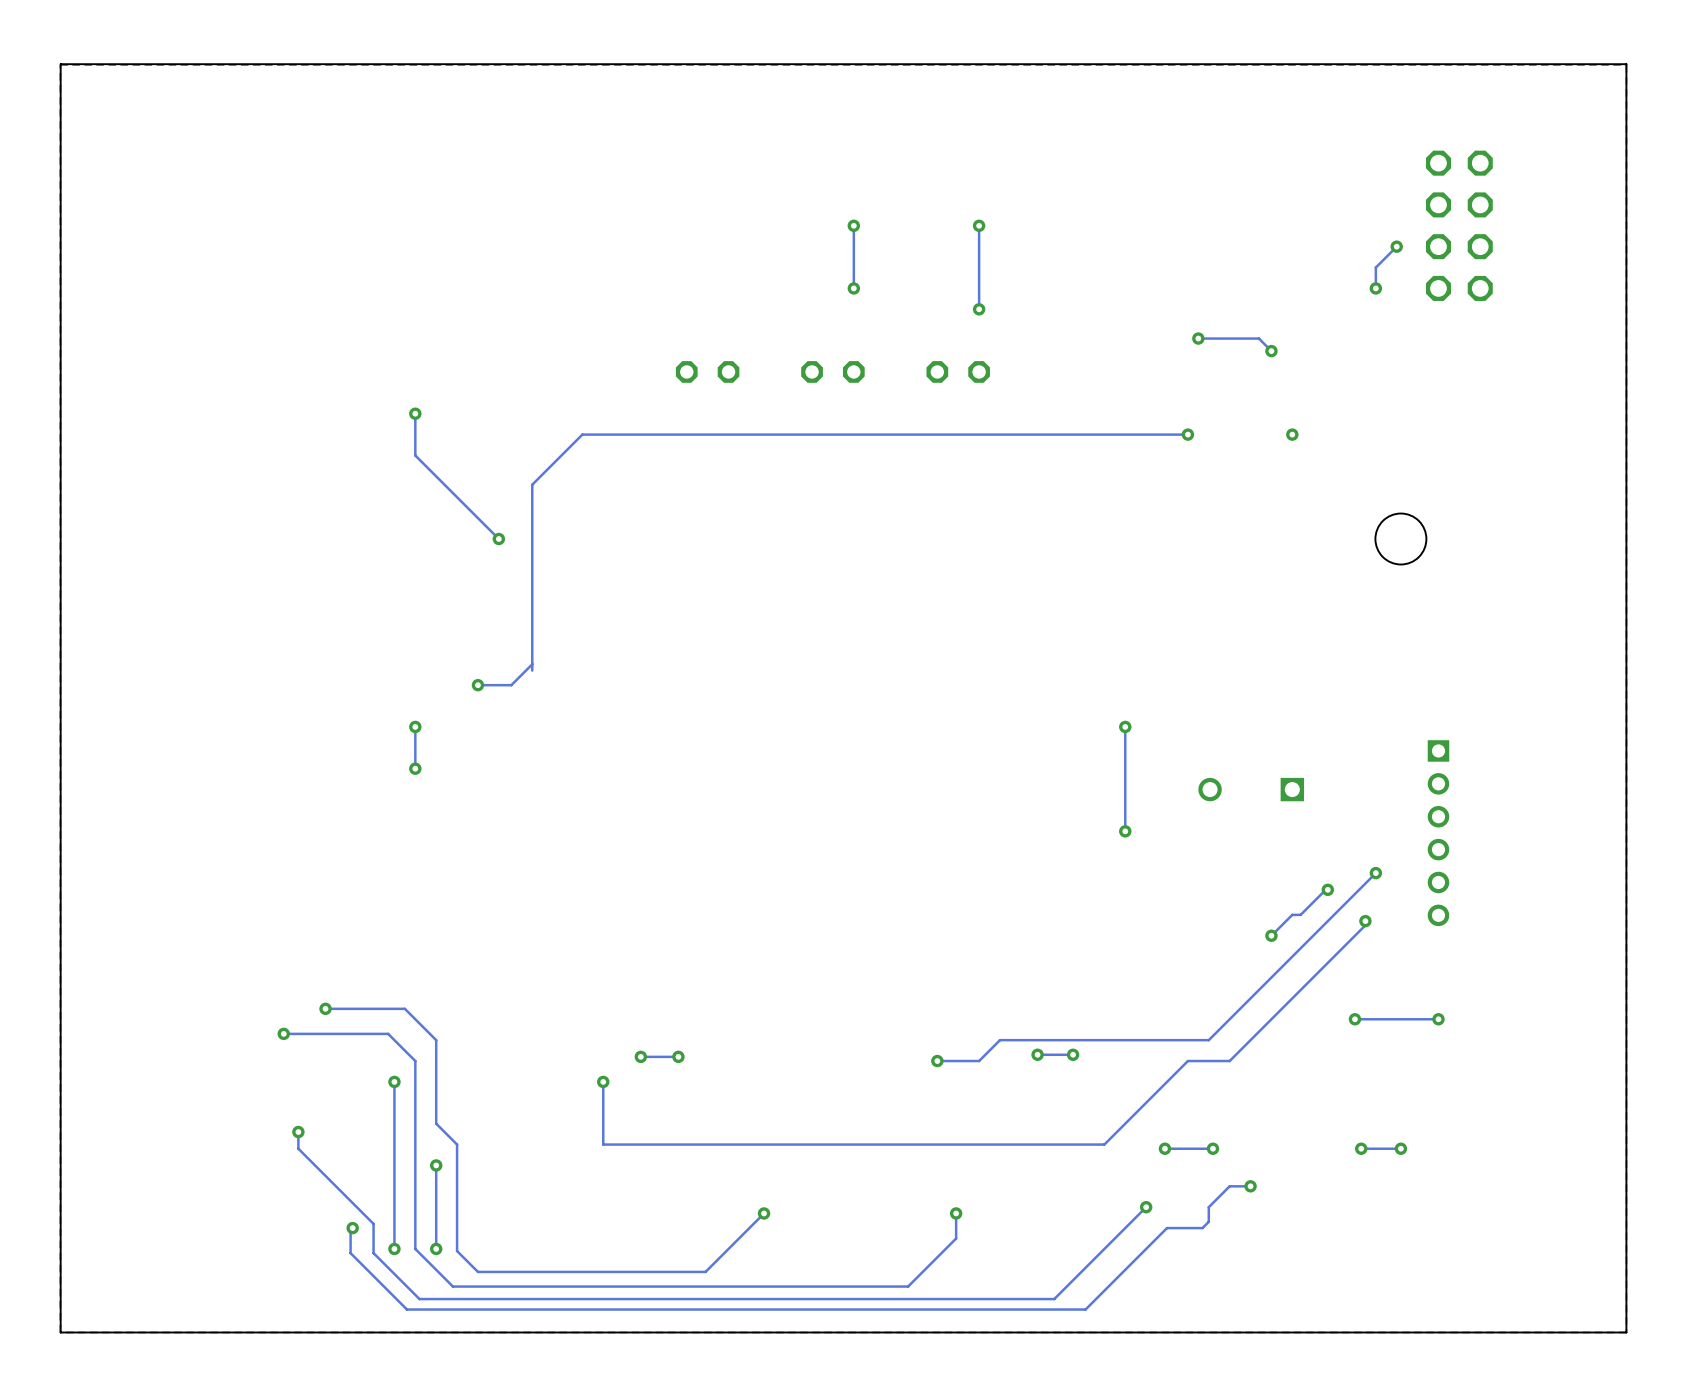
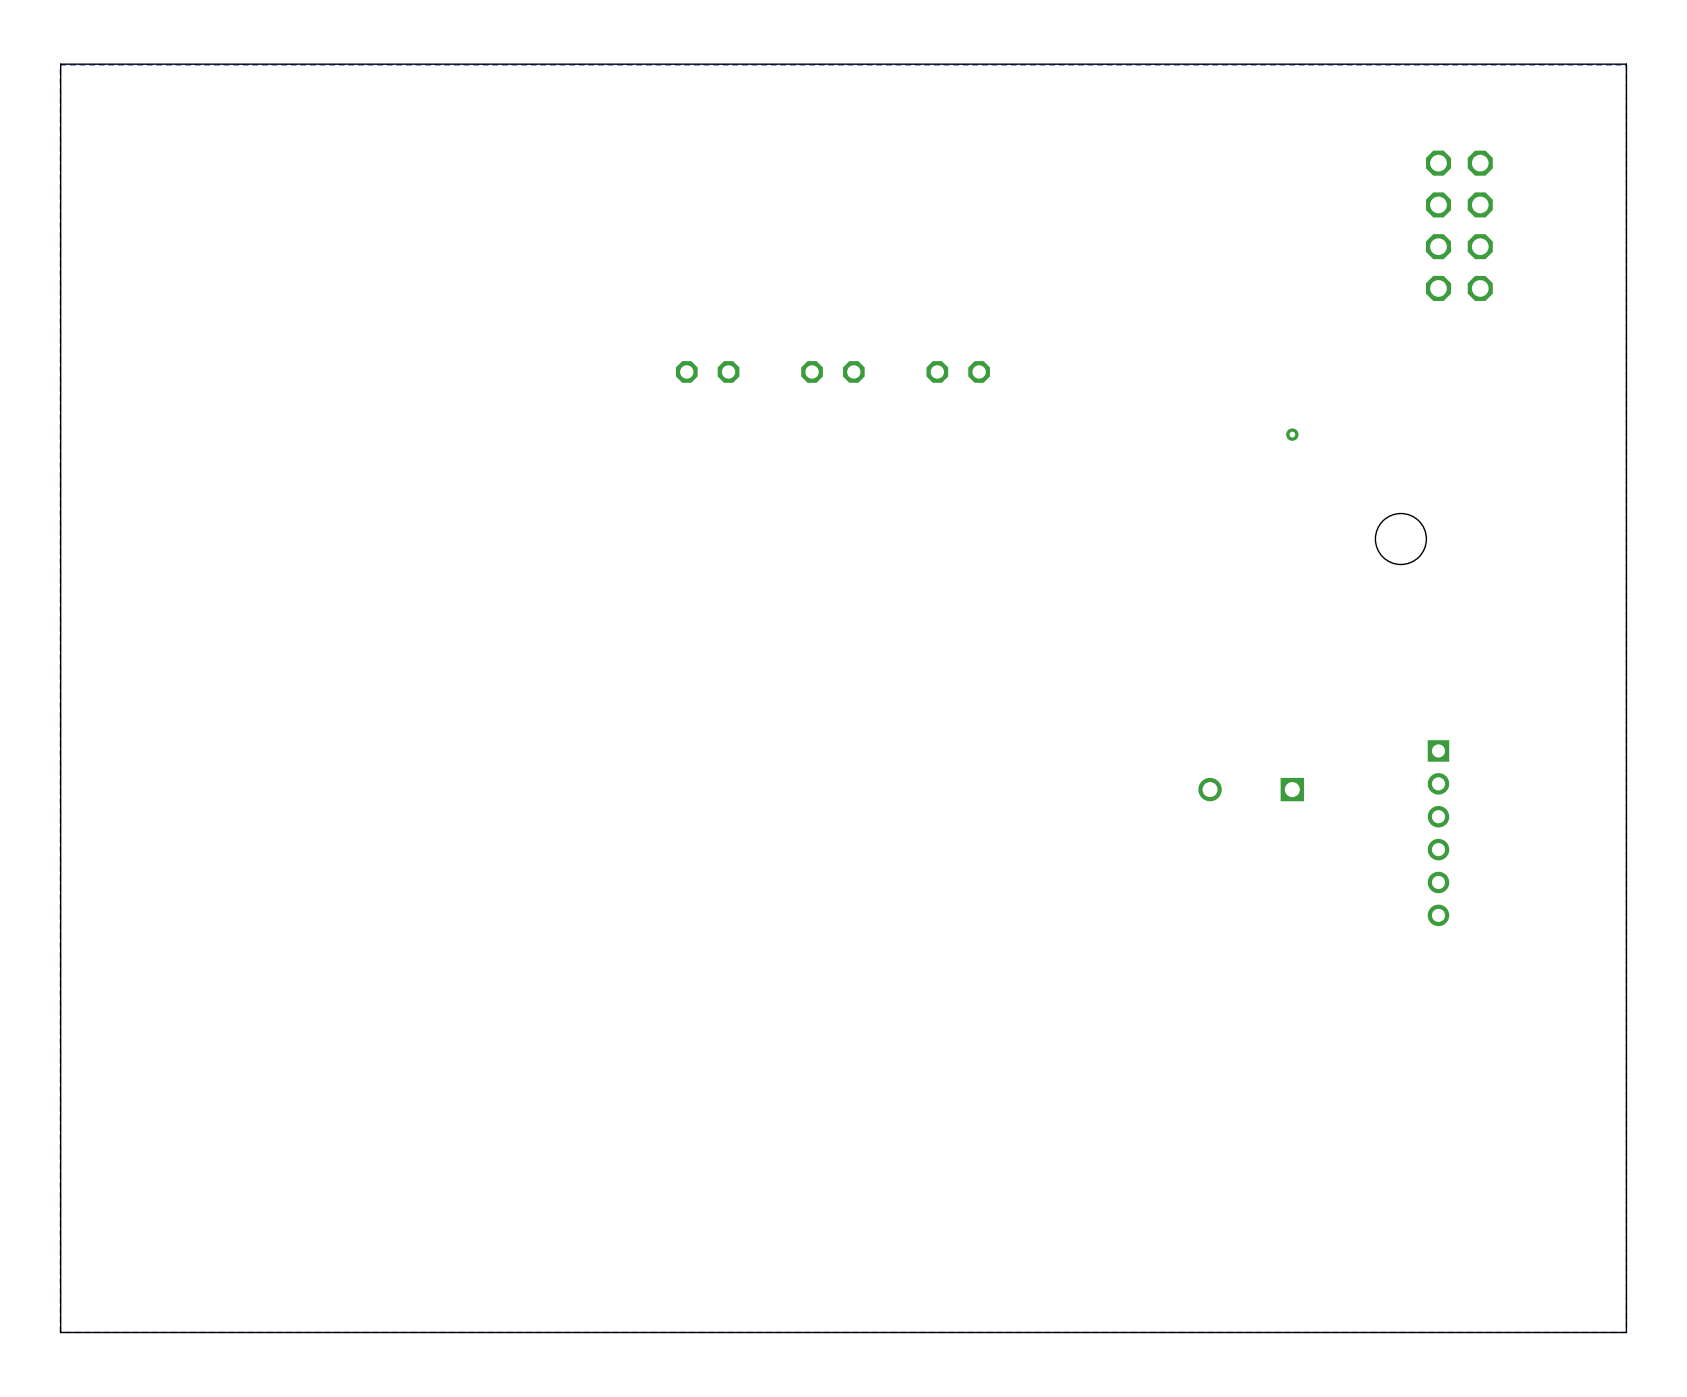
track: (853, 225) (853, 288) -> none
via: (853, 225) -> none
track: (979, 225) (979, 309) -> none
via: (979, 225) -> none
track: (1396, 246) (1375, 267) (1375, 288) -> none
via: (1396, 246) -> none
via: (853, 288) -> none
via: (1375, 288) -> none
via: (979, 309) -> none
track: (1198, 338) (1258, 338) (1271, 351) -> none
via: (1198, 338) -> none
via: (1271, 351) -> none
track: (415, 413) (415, 455) (498, 539) -> none
via: (415, 413) -> none
track: (1187, 434) (582, 434) (532, 484) (532, 670) -> none
via: (1187, 434) -> none
via: (498, 539) -> none
track: (532, 664) (511, 685) (477, 685) -> none
via: (477, 685) -> none
track: (415, 726) (415, 768) -> none
via: (415, 726) -> none
track: (1125, 726) (1125, 831) -> none
via: (1125, 726) -> none
via: (415, 768) -> none
via: (1125, 831) -> none
track: (1375, 873) (1208, 1040) (999, 1040) (979, 1061) (937, 1061) -> none
via: (1375, 873) -> none
track: (1327, 889) (1300, 914) (1292, 914) (1271, 935) -> none
via: (1327, 889) -> none
track: (1365, 921) (1365, 925) (1229, 1061) (1187, 1061) (1104, 1144) (603, 1144) (603, 1081) -> none
via: (1365, 921) -> none
via: (1271, 935) -> none
track: (325, 1008) (404, 1008) (436, 1040) (436, 1123) (457, 1144) (457, 1251) (477, 1271) (705, 1271) (764, 1213) -> none
via: (325, 1008) -> none
via: (1354, 1019) -> none
track: (1438, 1019) (1354, 1019) -> none
via: (1438, 1019) -> none
track: (283, 1033) (388, 1033) (415, 1061) (415, 1248) (452, 1286) (908, 1286) (956, 1238) (956, 1213) -> none
via: (283, 1033) -> none
via: (1037, 1054) -> none
track: (1073, 1054) (1037, 1054) -> none
via: (1073, 1054) -> none
via: (640, 1056) -> none
track: (678, 1056) (640, 1056) -> none
via: (678, 1056) -> none
via: (937, 1061) -> none
track: (394, 1081) (394, 1248) -> none
via: (394, 1081) -> none
via: (603, 1081) -> none
track: (298, 1132) (298, 1148) (373, 1223) (373, 1253) (419, 1299) (1054, 1299) (1146, 1207) -> none
via: (298, 1132) -> none
via: (1164, 1148) -> none
track: (1212, 1148) (1164, 1148) -> none
via: (1212, 1148) -> none
via: (1361, 1148) -> none
track: (1400, 1148) (1361, 1148) -> none
via: (1400, 1148) -> none
track: (436, 1165) (436, 1248) -> none
via: (436, 1165) -> none
track: (1250, 1186) (1229, 1186) (1208, 1207) (1208, 1221) (1202, 1228) (1167, 1228) (1085, 1309) (406, 1309) (350, 1253) (350, 1230) (352, 1228) -> none
via: (1250, 1186) -> none
via: (1146, 1207) -> none
via: (764, 1213) -> none
via: (956, 1213) -> none
via: (352, 1228) -> none
via: (394, 1248) -> none
via: (436, 1248) -> none

